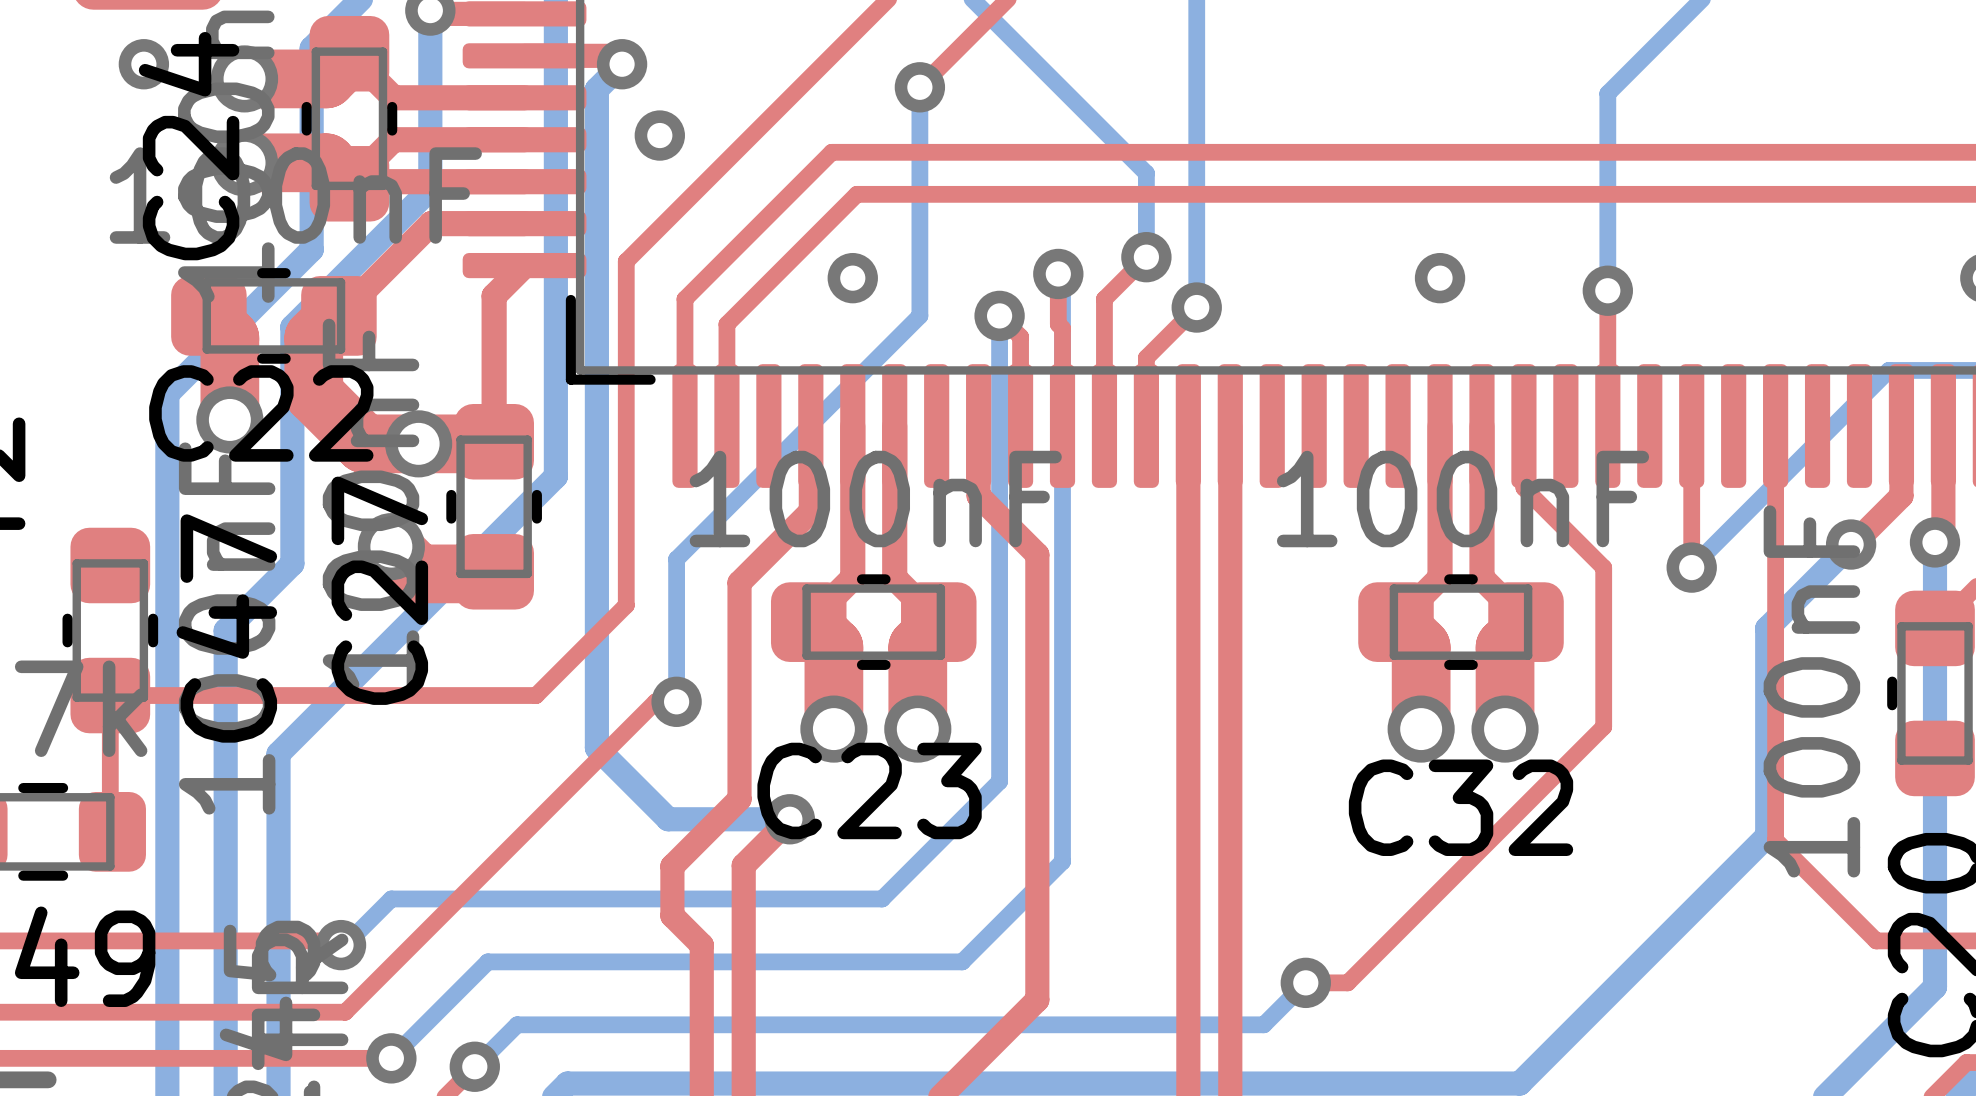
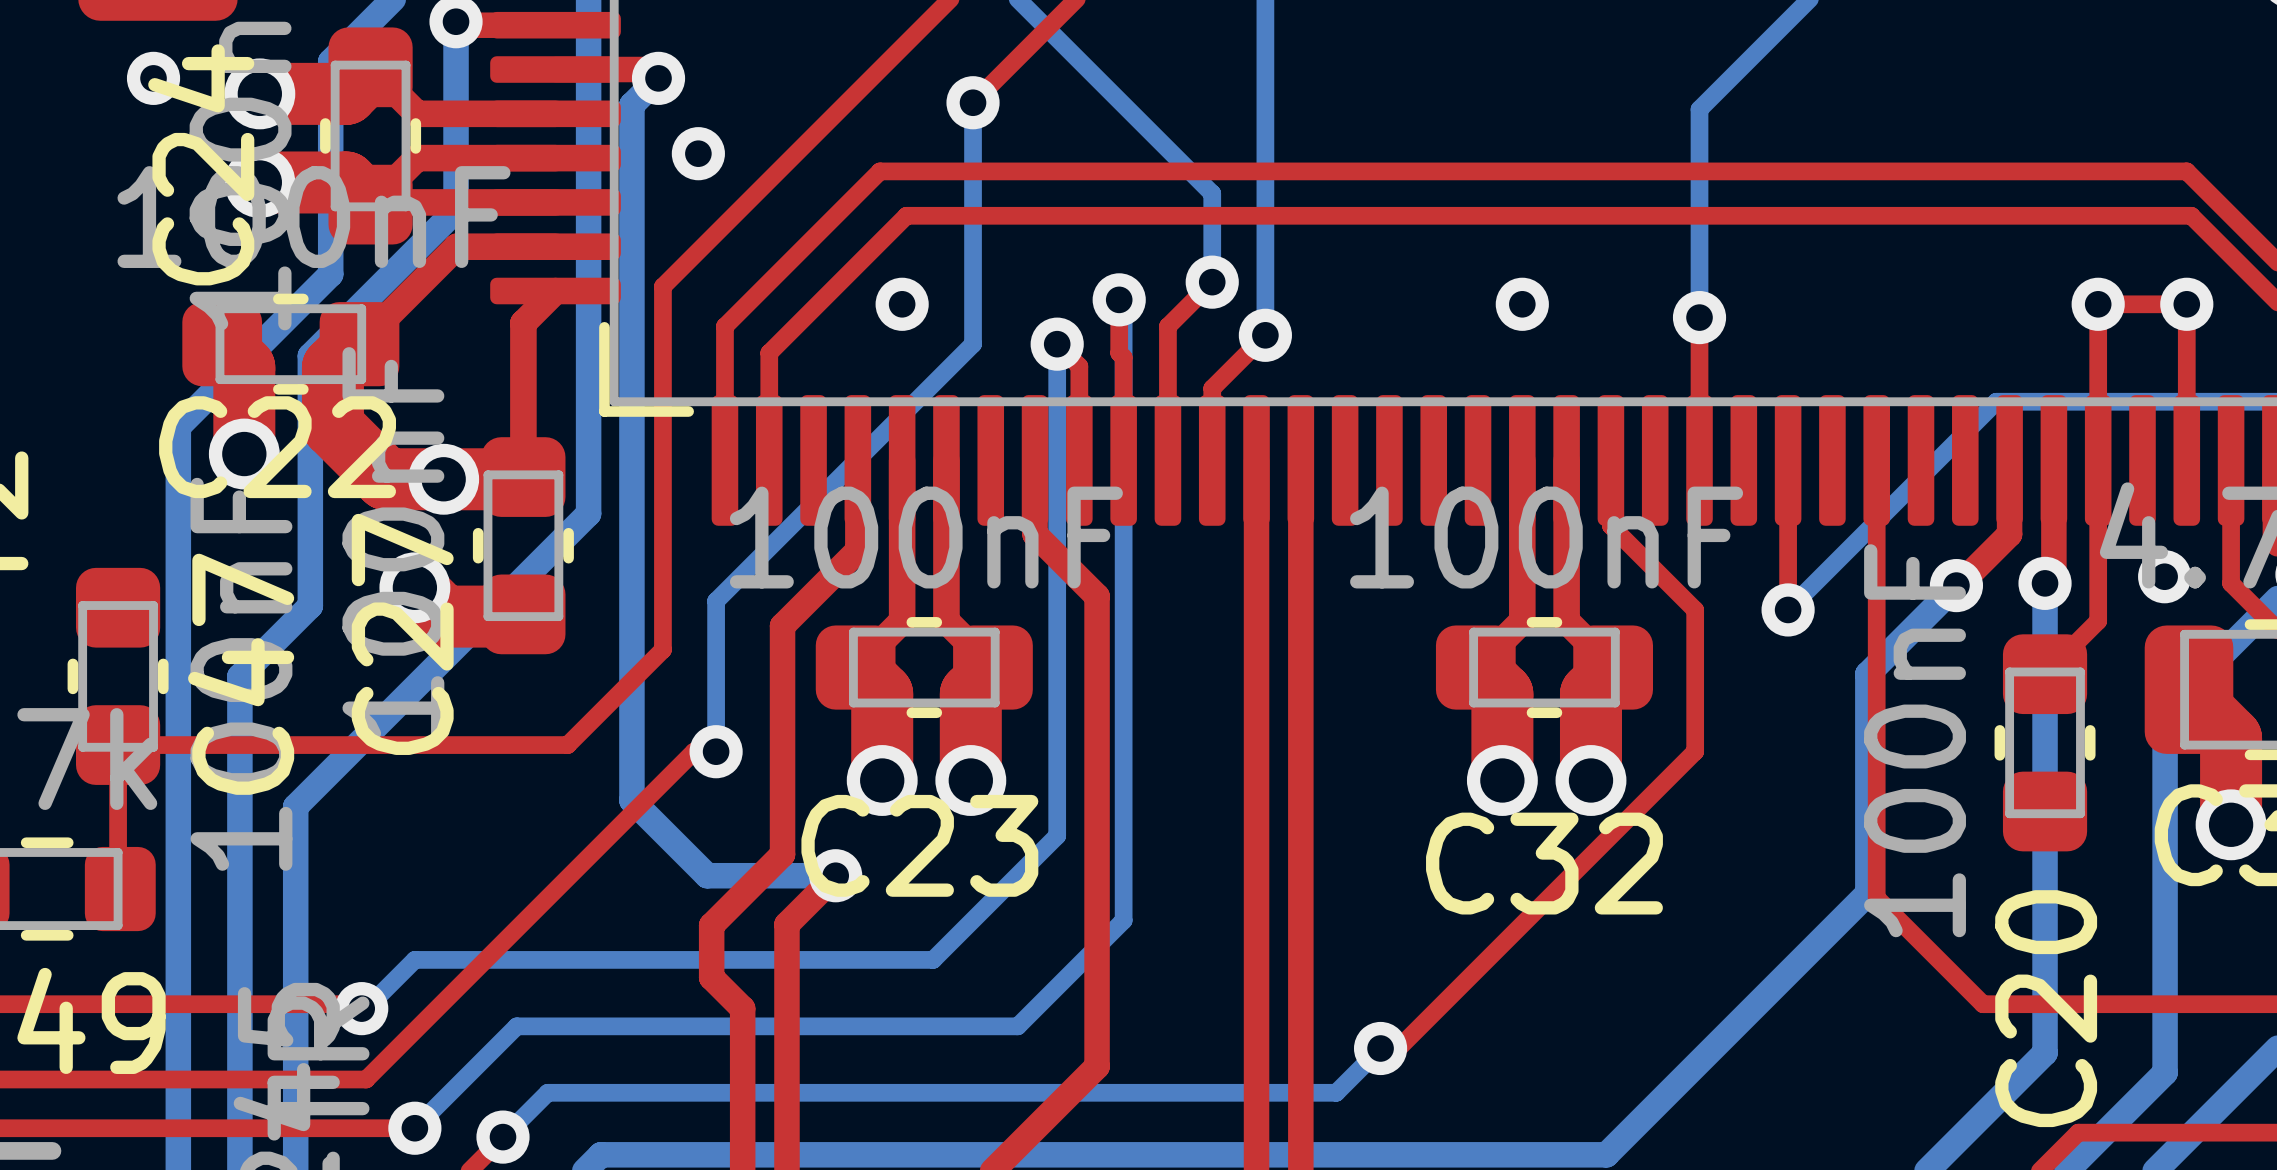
top track: (1603, 701) (1603, 726) (1347, 982) (1322, 982) -> (1695, 751) (1398, 1048)

